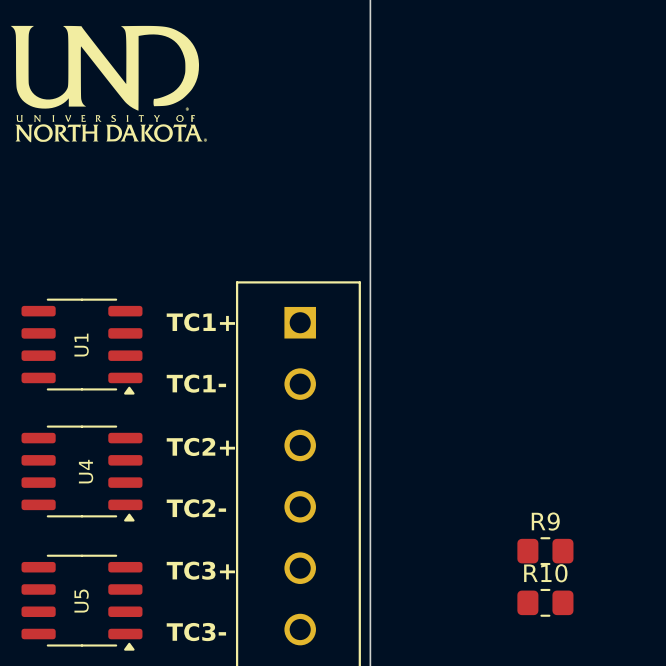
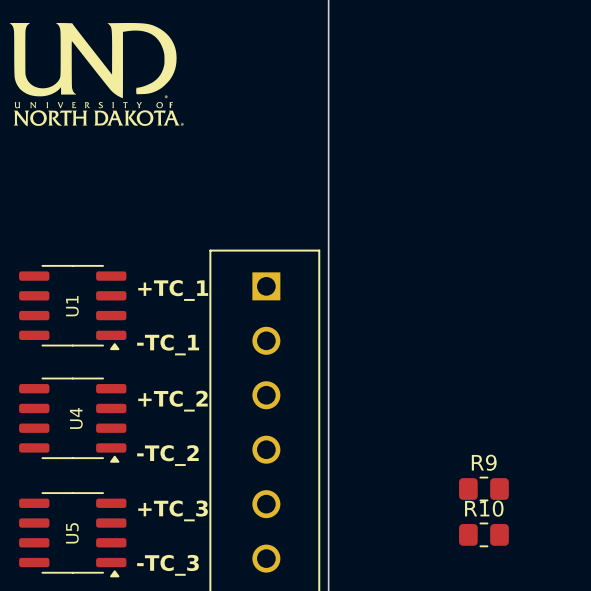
text: TC1+ (200, 322) -> +TC_1 (173, 290)
text: TC1- (196, 383) -> -TC_1 (168, 344)
text: TC2+ (200, 446) -> +TC_2 (172, 401)
text: TC2- (196, 508) -> -TC_2 (167, 455)
text: TC3+ (200, 570) -> +TC_3 (173, 510)
text: TC3- (196, 632) -> -TC_3 (167, 565)

